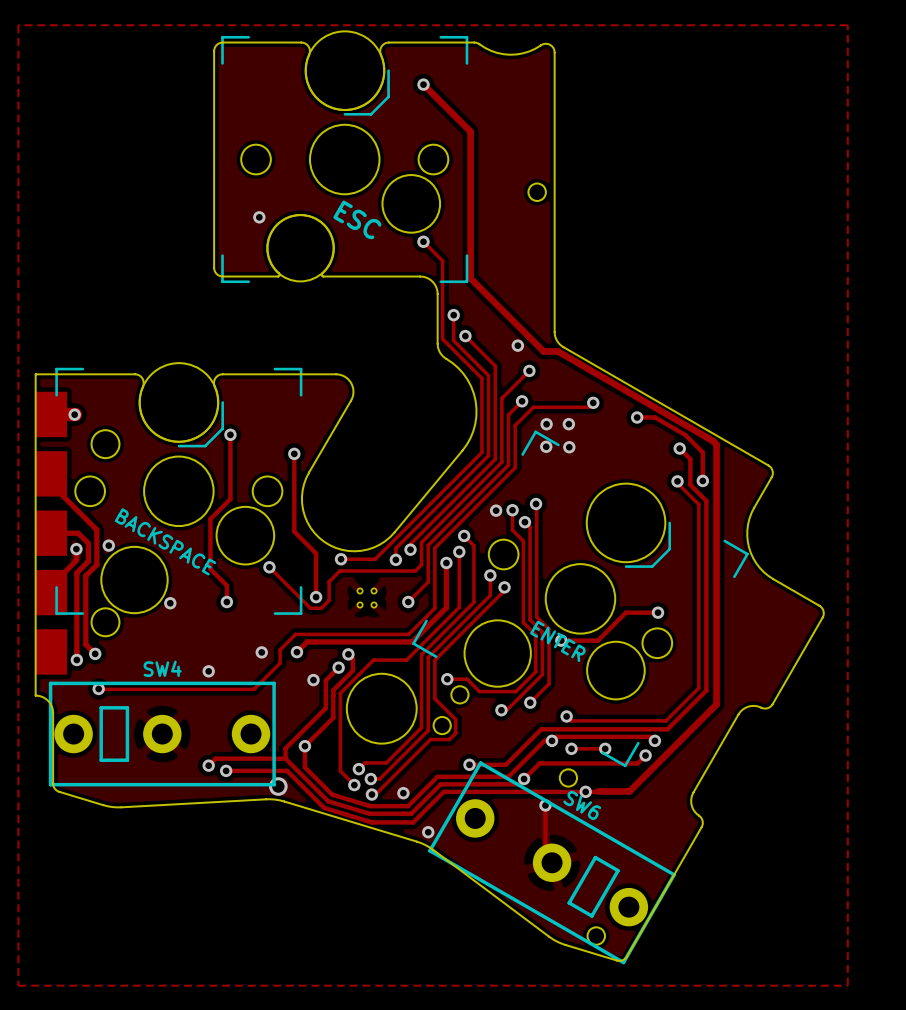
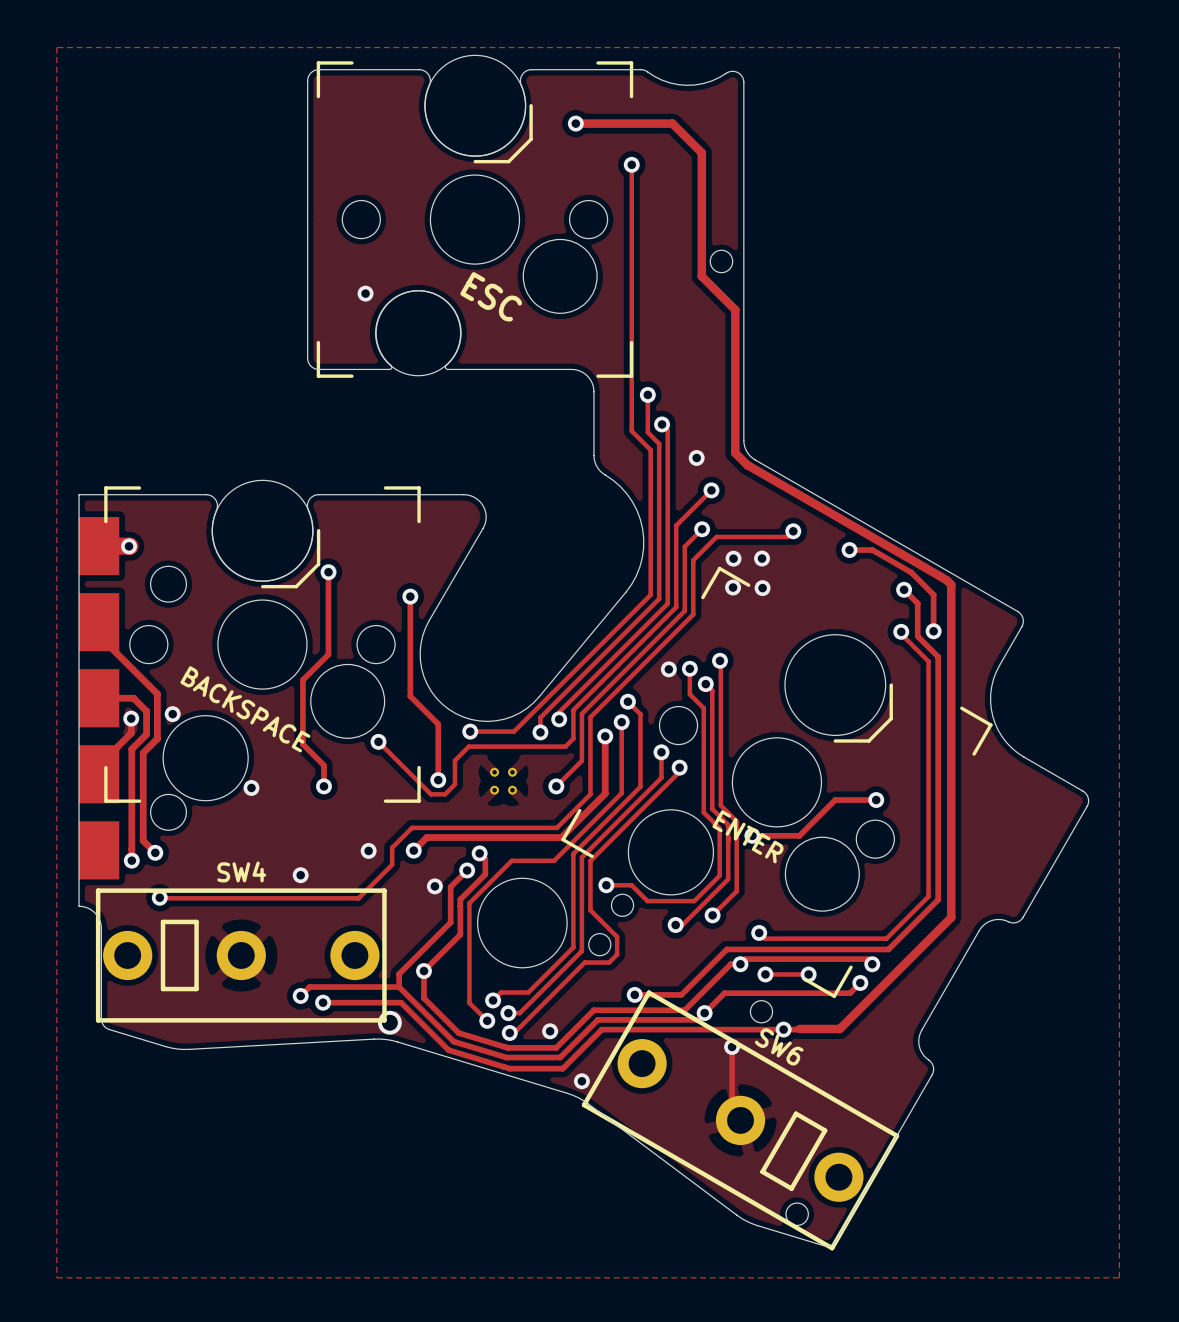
track: (423, 84) (470, 131) (470, 278) (543, 351) (557, 351) -> (575, 123) (672, 123) (701, 152) (701, 276) (735, 309) (735, 453) (747, 465)
via: none -> (631, 164)
track: (423, 241) (442, 260) (442, 339) (481, 378) -> (631, 164) (631, 431) (650, 450) (650, 499)
via: (423, 241) -> none
via: none -> (647, 394)
track: (453, 315) (453, 340) (488, 375) -> (647, 394) (647, 432) (659, 443) (659, 496)
via: (453, 315) -> none
via: none -> (662, 424)
track: (465, 336) (495, 365) -> (662, 424) (667, 430) (667, 483)
via: (465, 336) -> none

